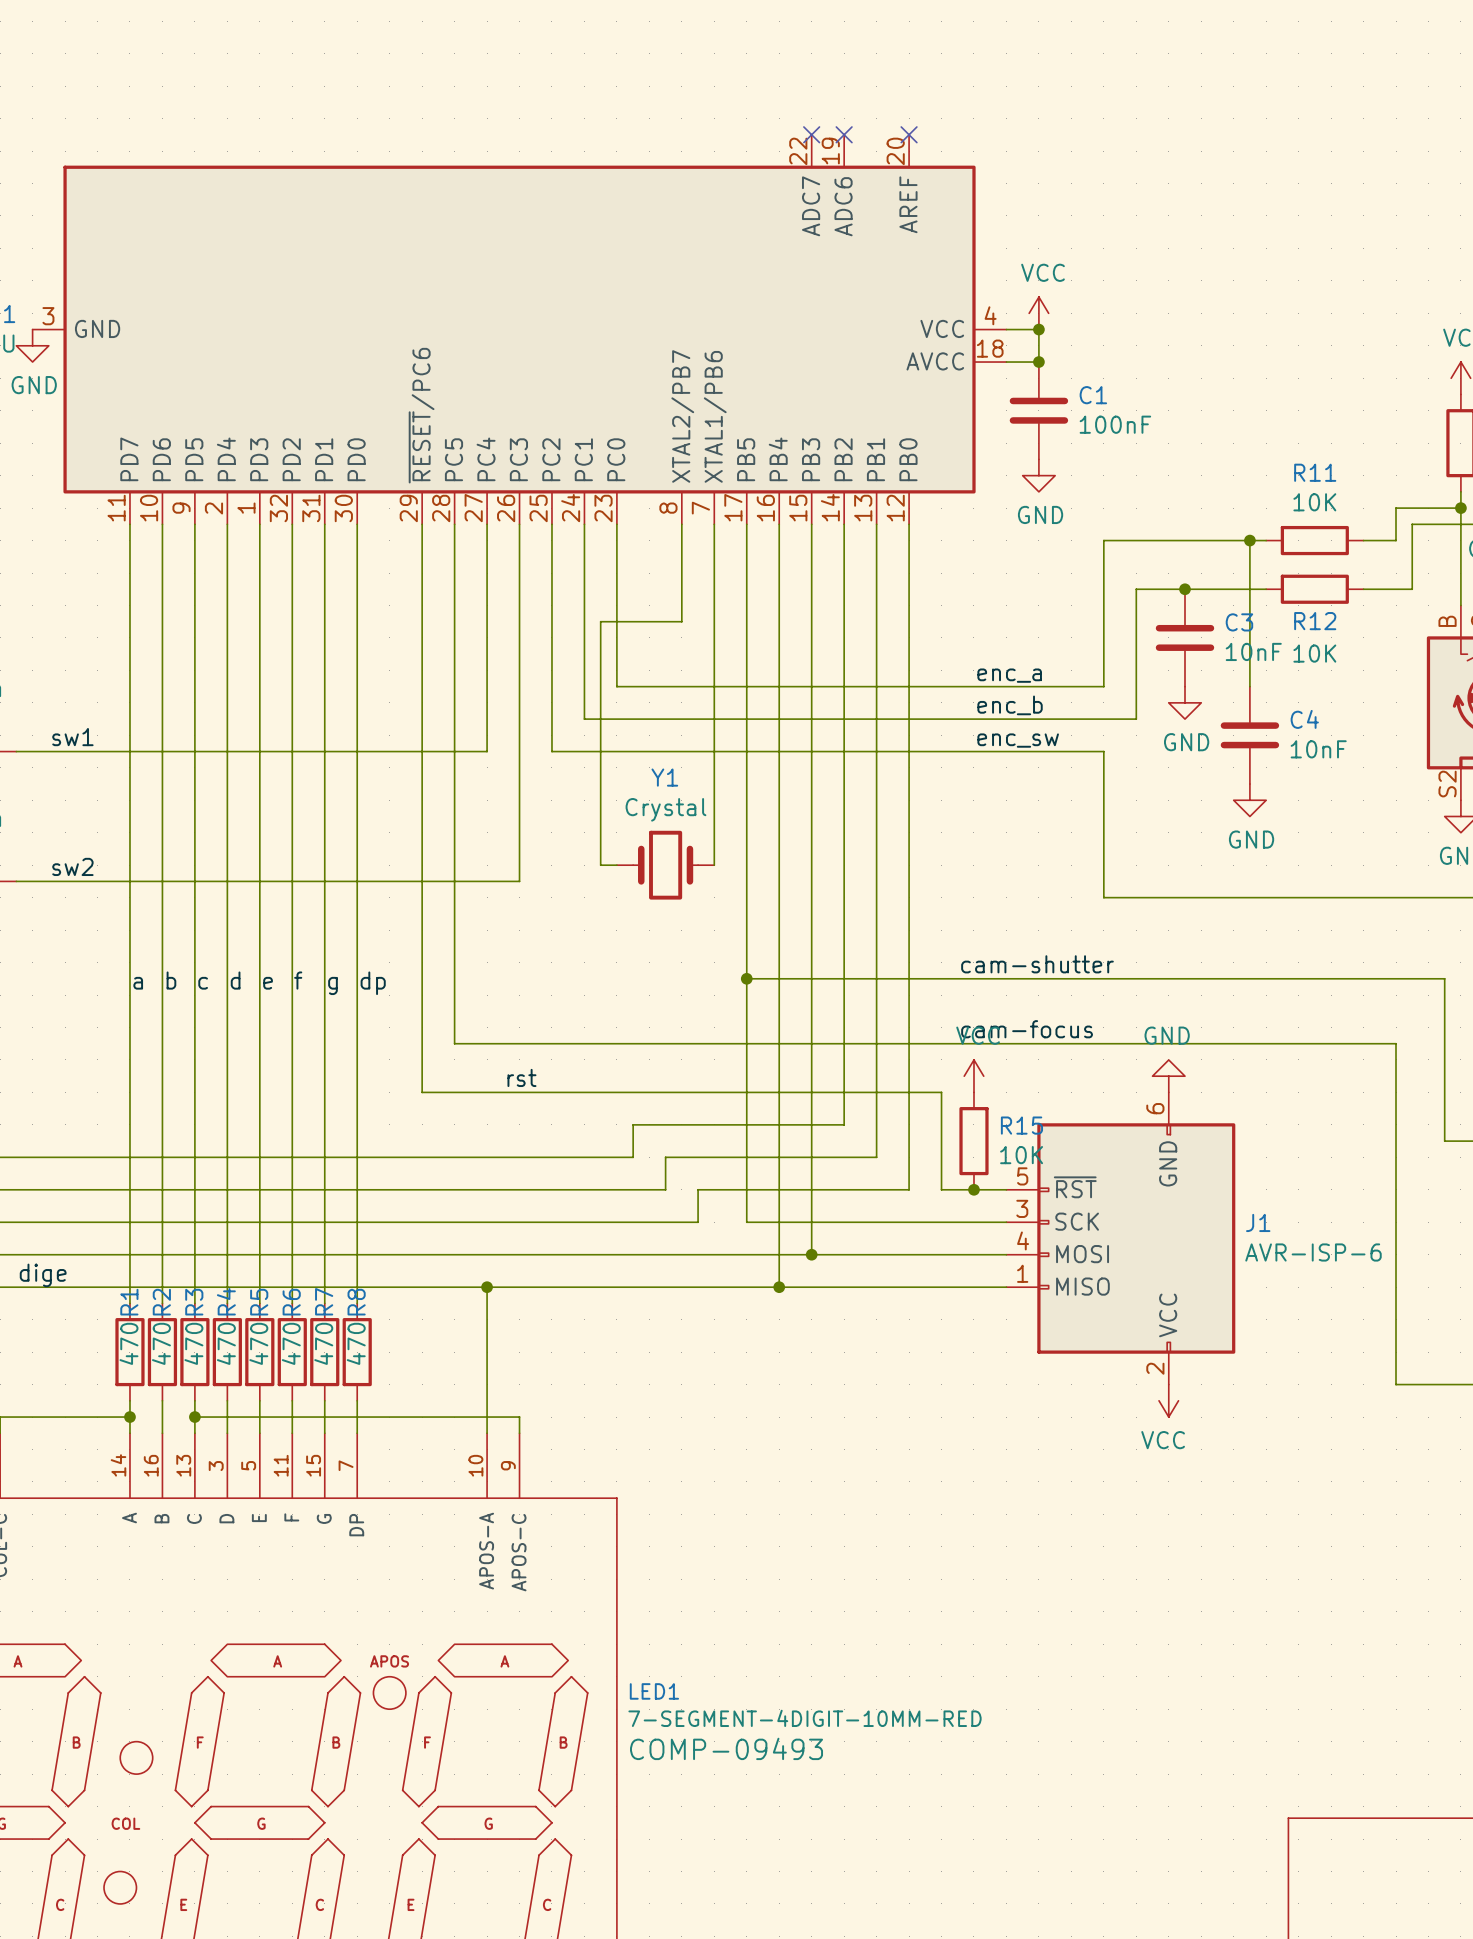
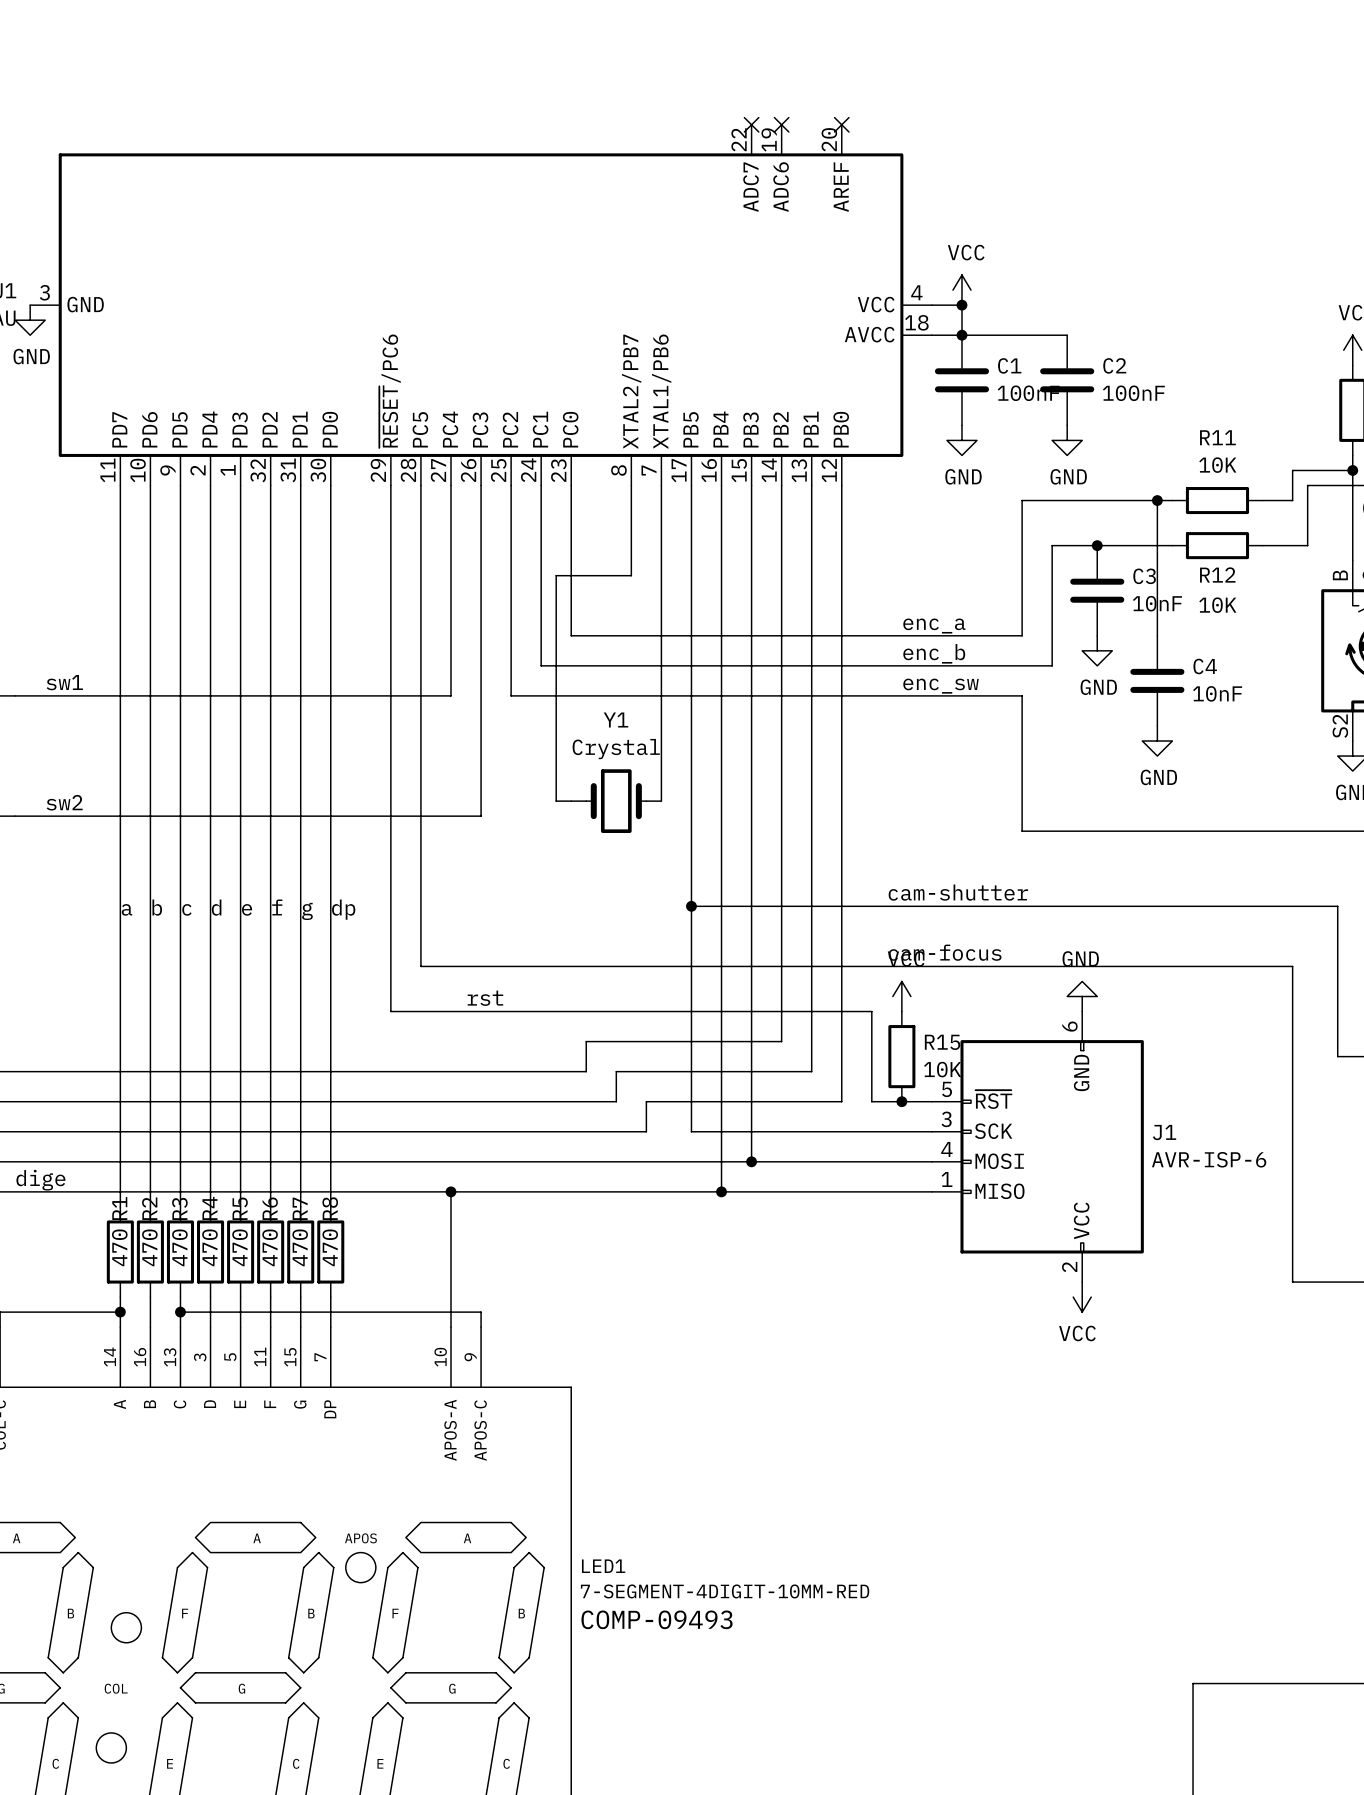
wire: none -> (961, 335) (1067, 335)
C2: none -> 100nF (1067, 380)
power symbol: none -> GND (1067, 440)

